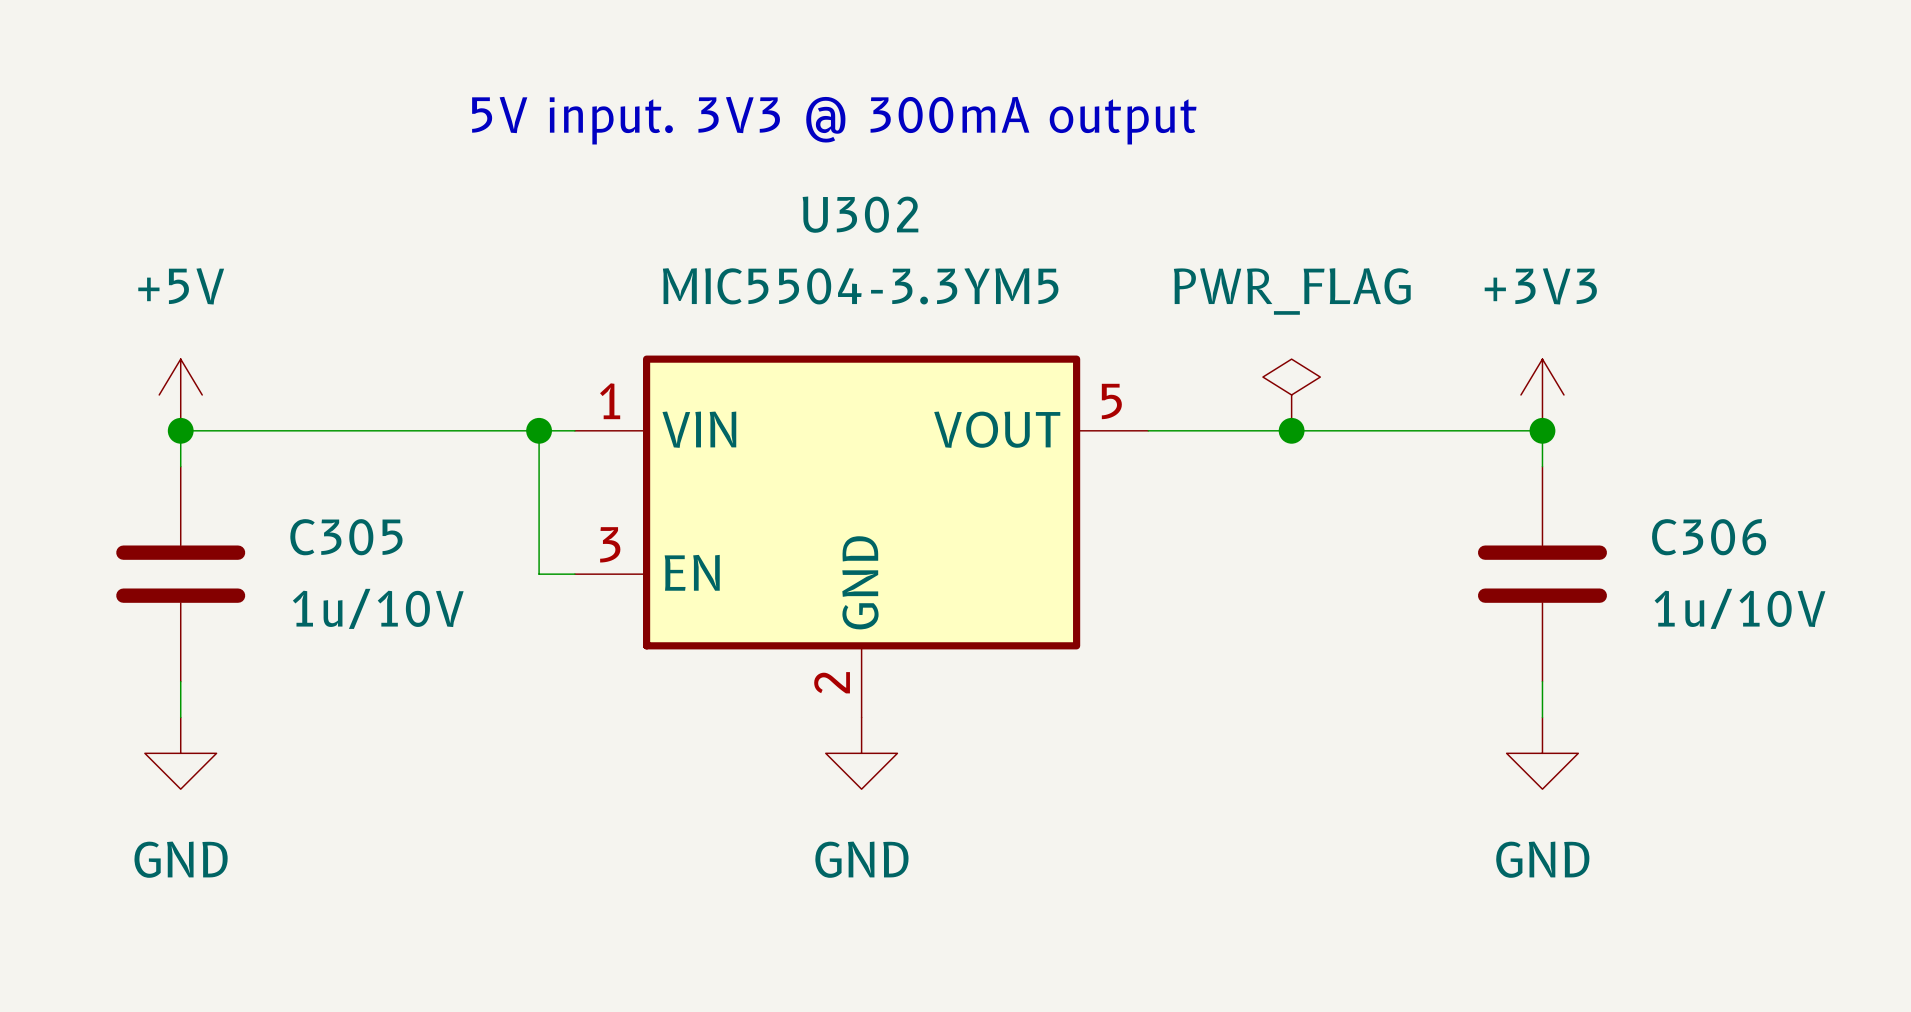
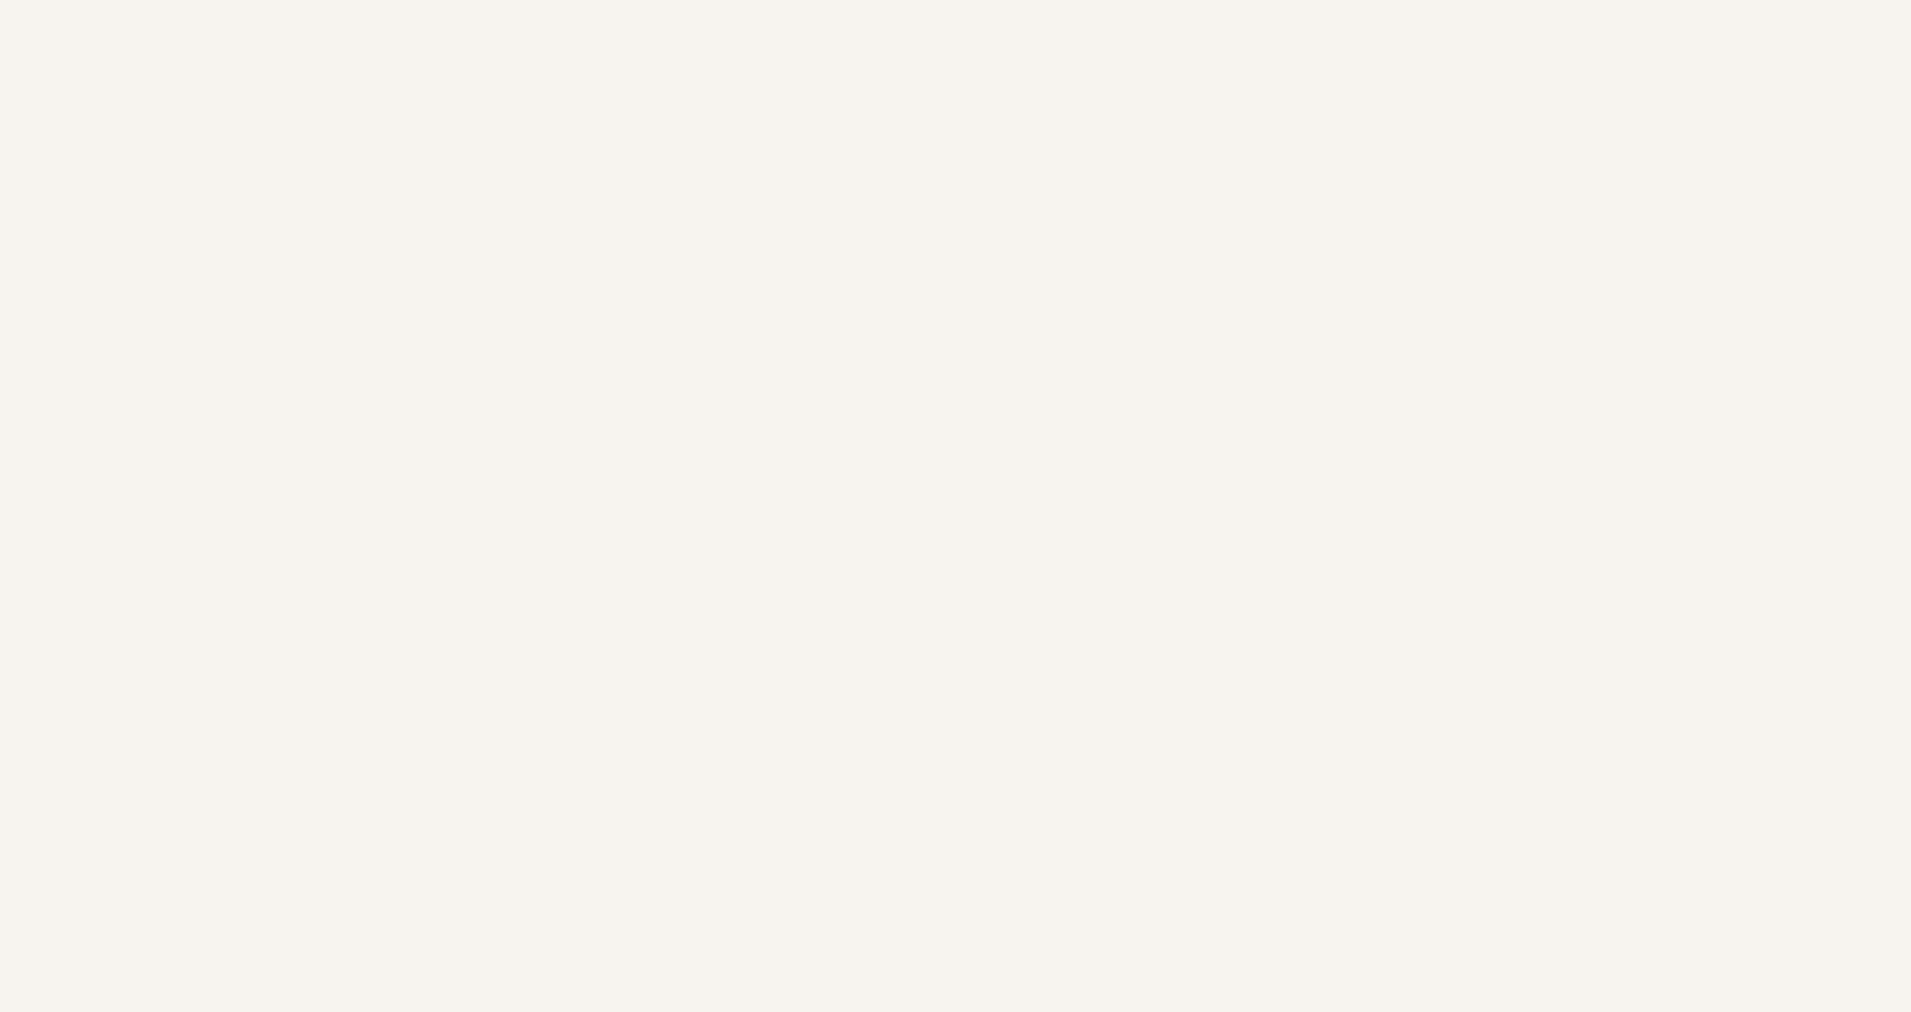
text: 5V input. 3V3 @ 300mA output (834, 120) -> none
power symbol: +5V (180, 394) -> none
power symbol: PWR_FLAG (1291, 394) -> none
power symbol: +3V3 (1542, 394) -> none
junction: (180, 430) -> none
wire: (539, 430) (539, 574) (574, 574) -> none
junction: (539, 430) -> none
wire: (574, 430) (180, 430) (180, 466) -> none
wire: (1148, 430) (1542, 430) (1542, 466) -> none
junction: (1291, 430) -> none
junction: (1542, 430) -> none
U302: MIC5504-3.3YM5 (861, 536) -> none
C305: 1u/10V (180, 574) -> none
C306: 1u/10V (1542, 574) -> none
wire: (180, 681) (180, 717) -> none
wire: (1542, 681) (1542, 717) -> none
power symbol: GND (180, 753) -> none
power symbol: GND (861, 753) -> none
power symbol: GND (1542, 753) -> none

